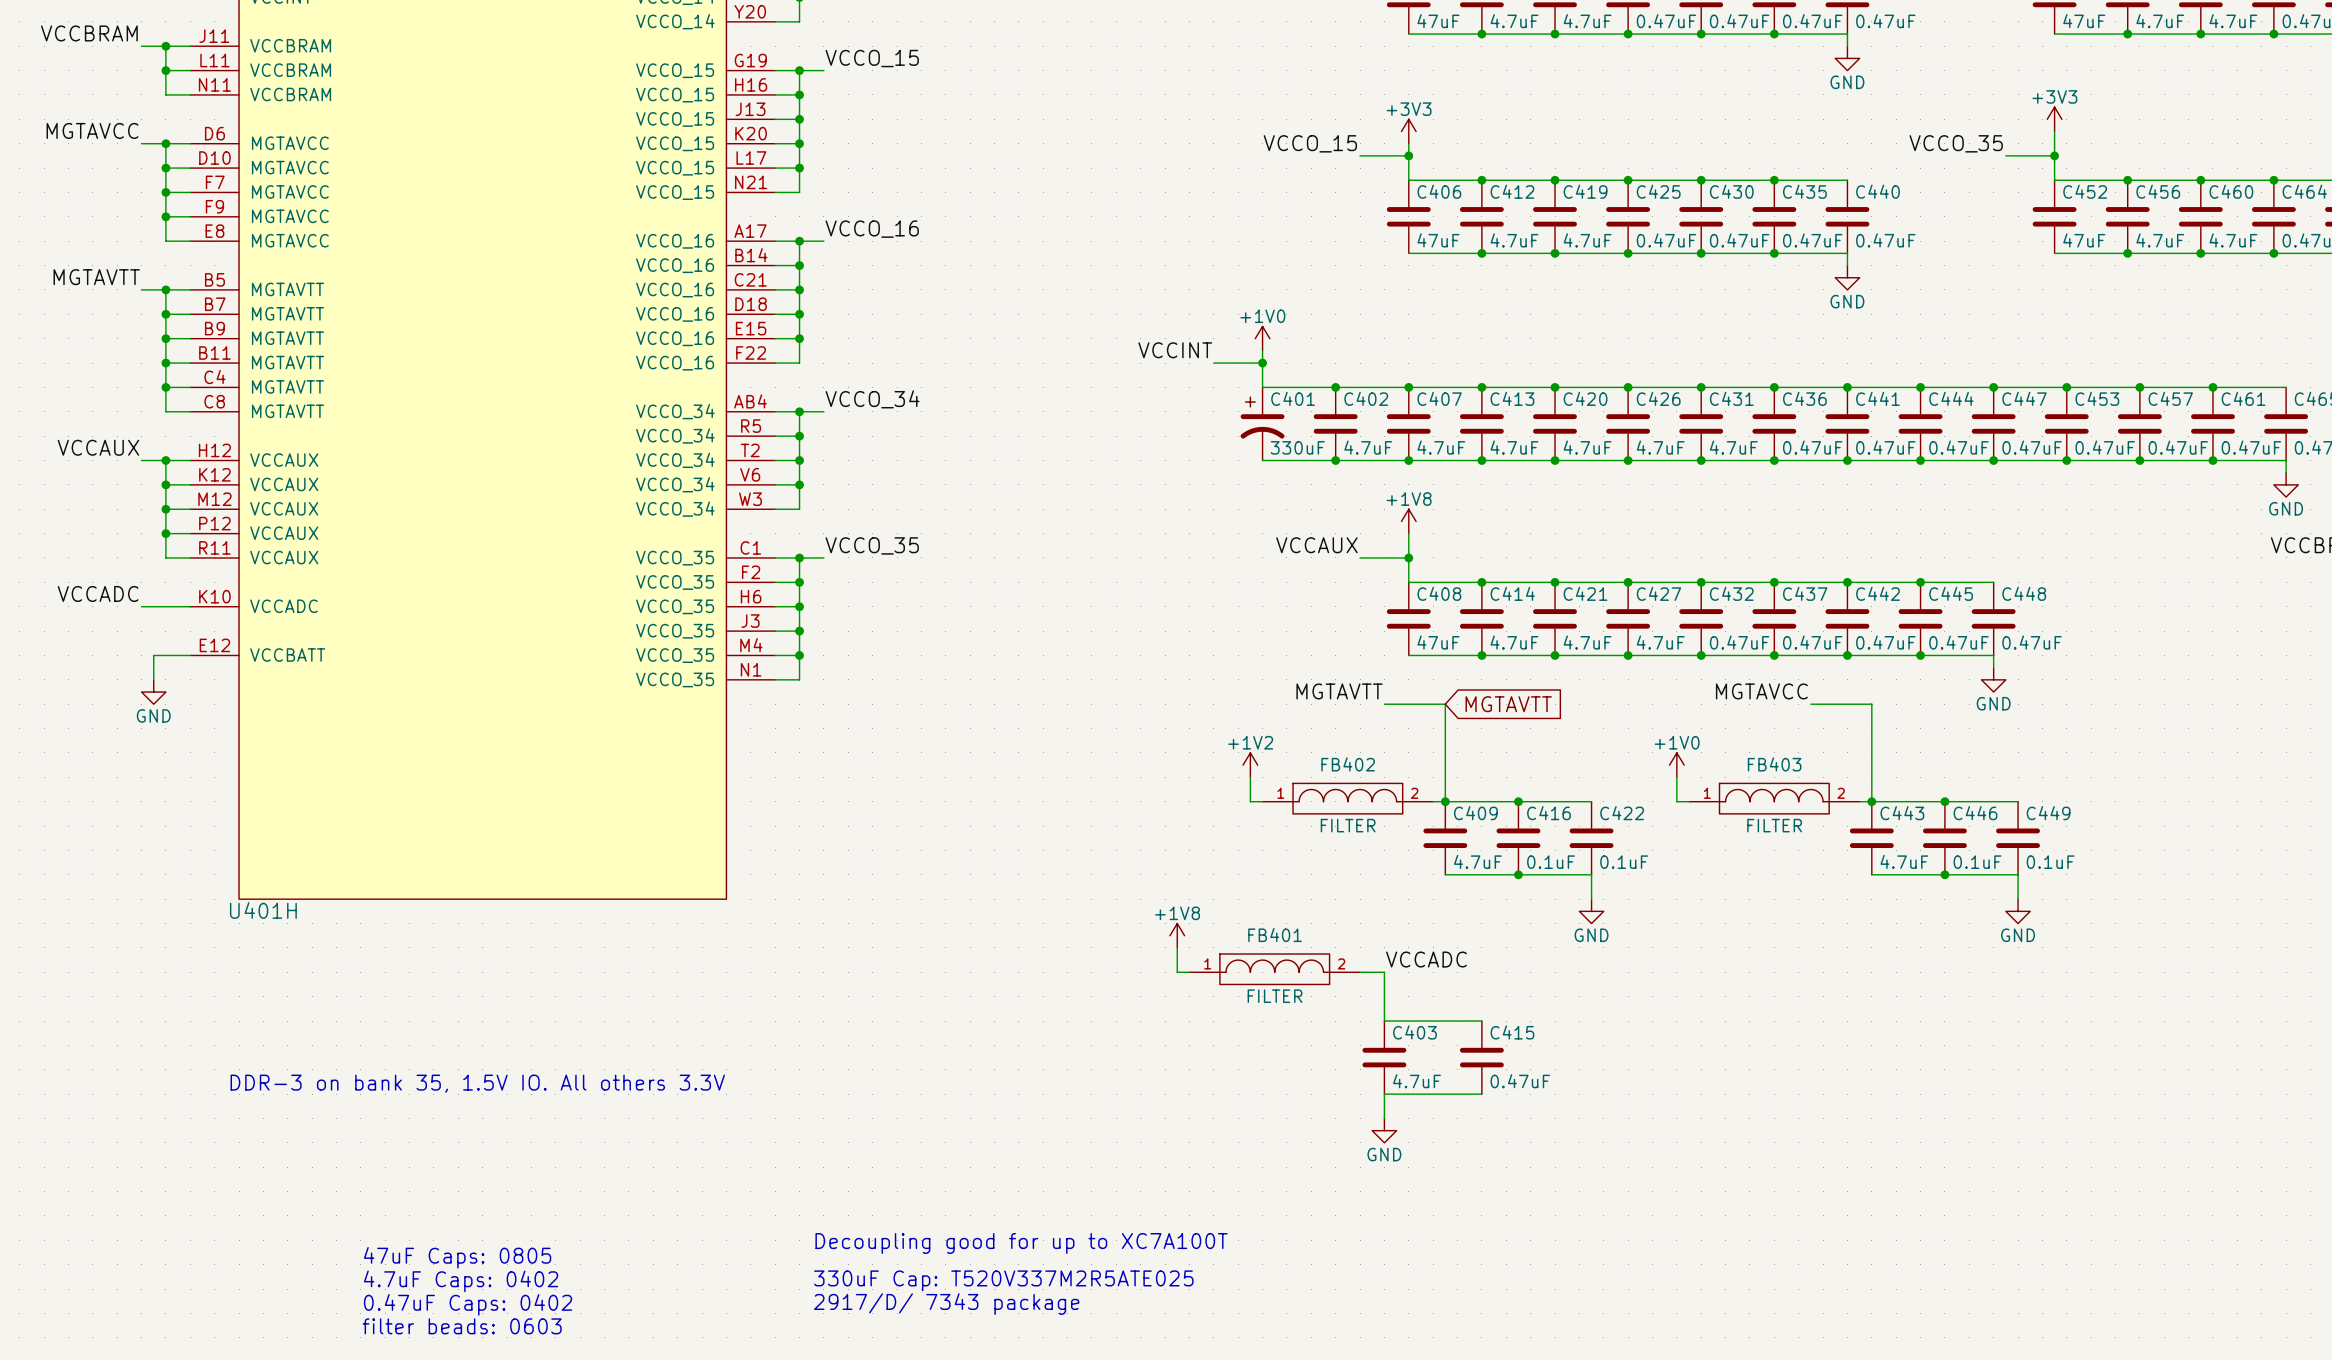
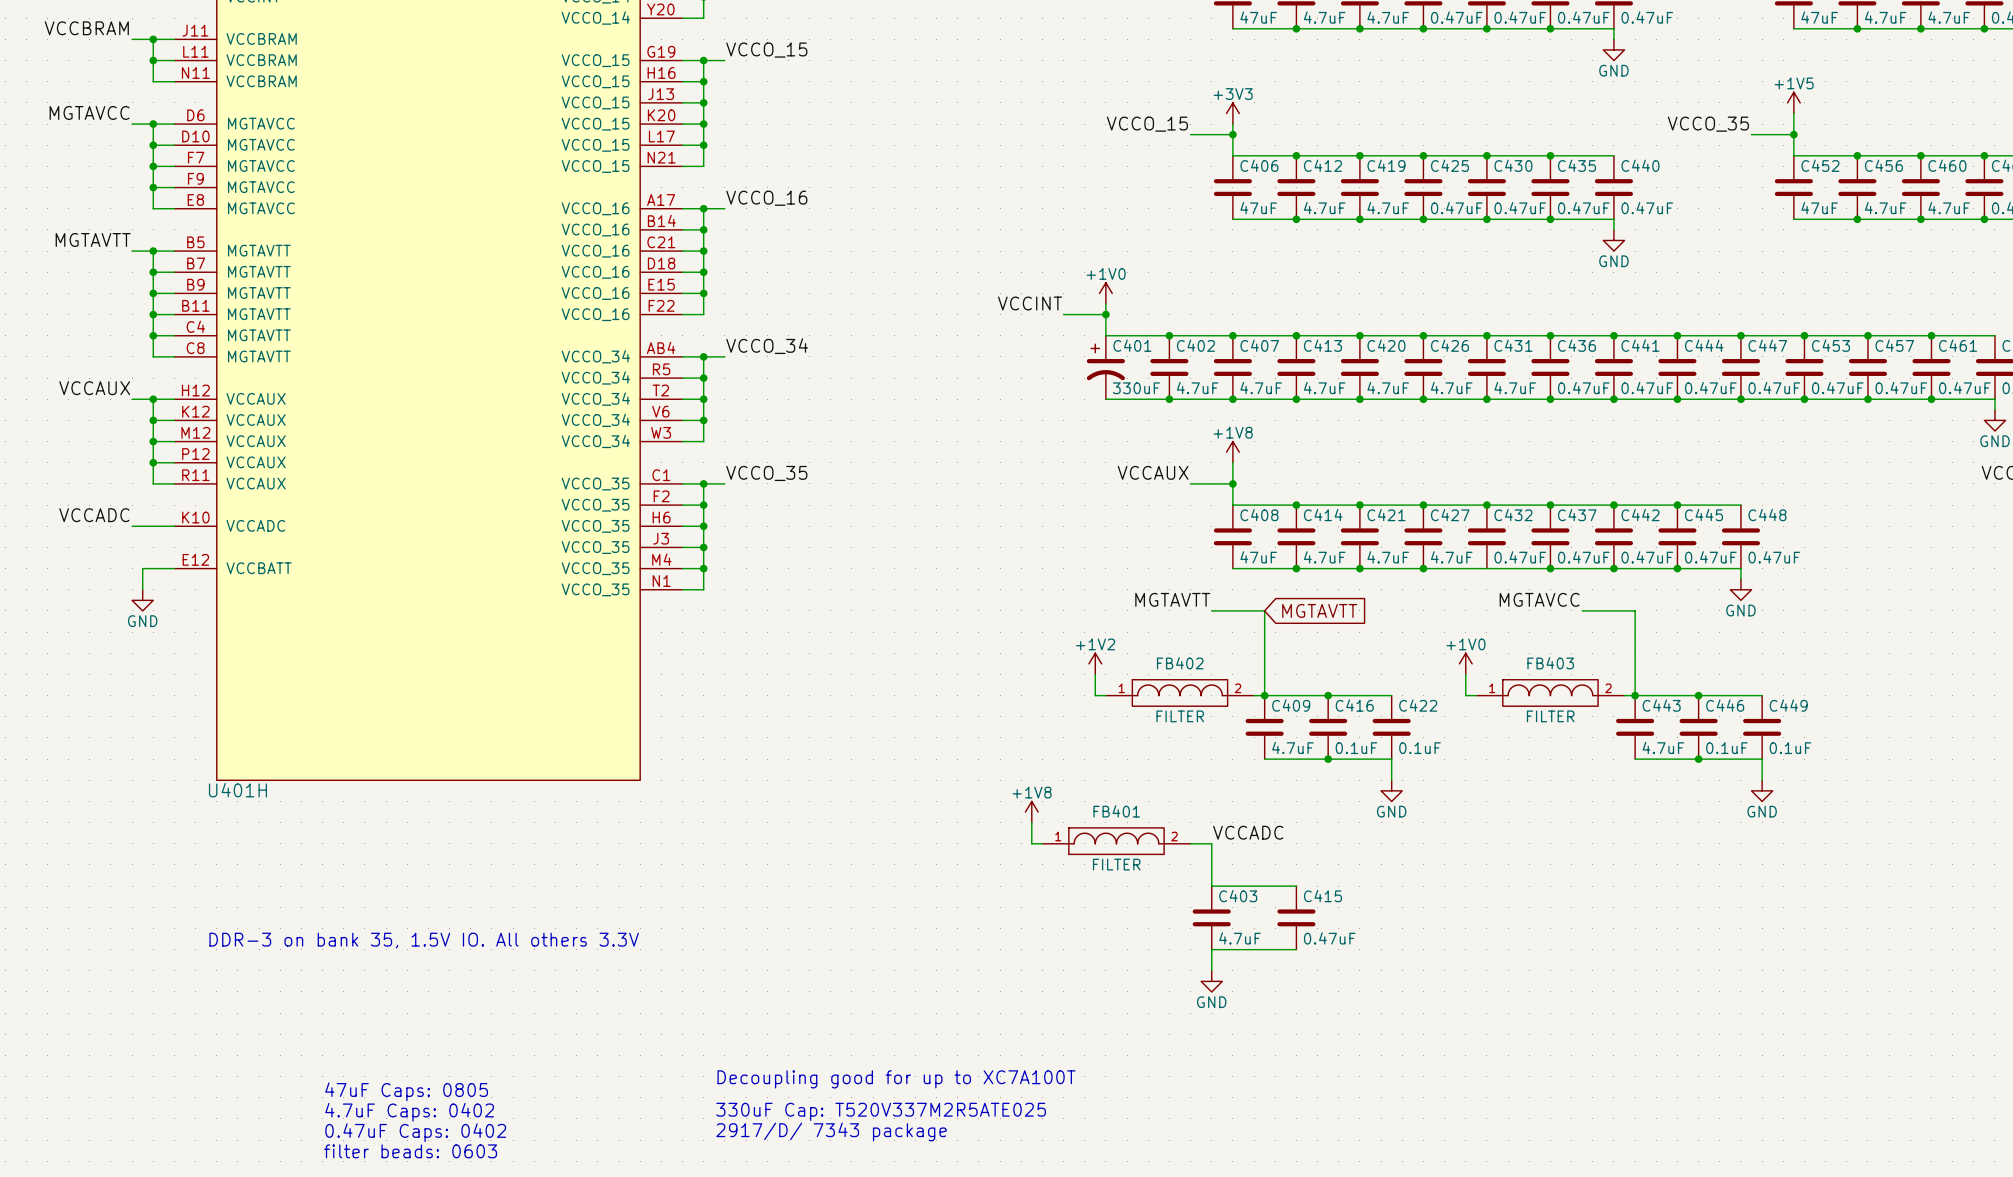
power symbol: +3V3 (2054, 119) -> +1V5 (1793, 102)
junction: (1701, 655) -> none

